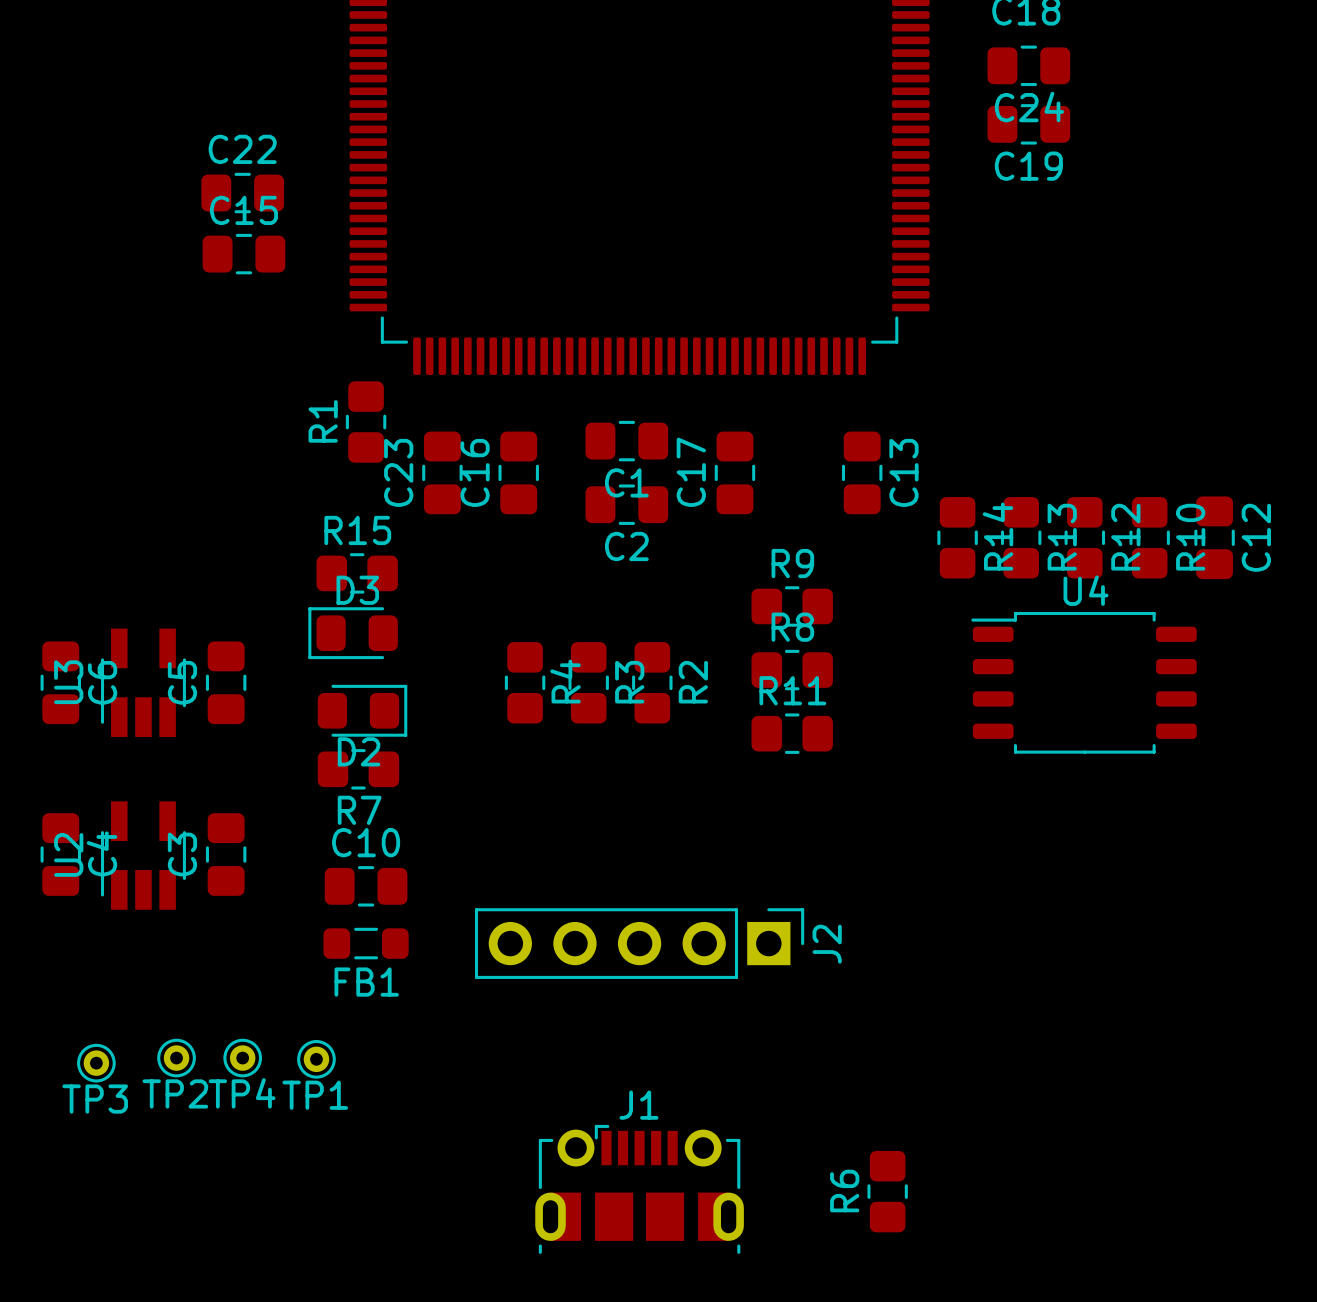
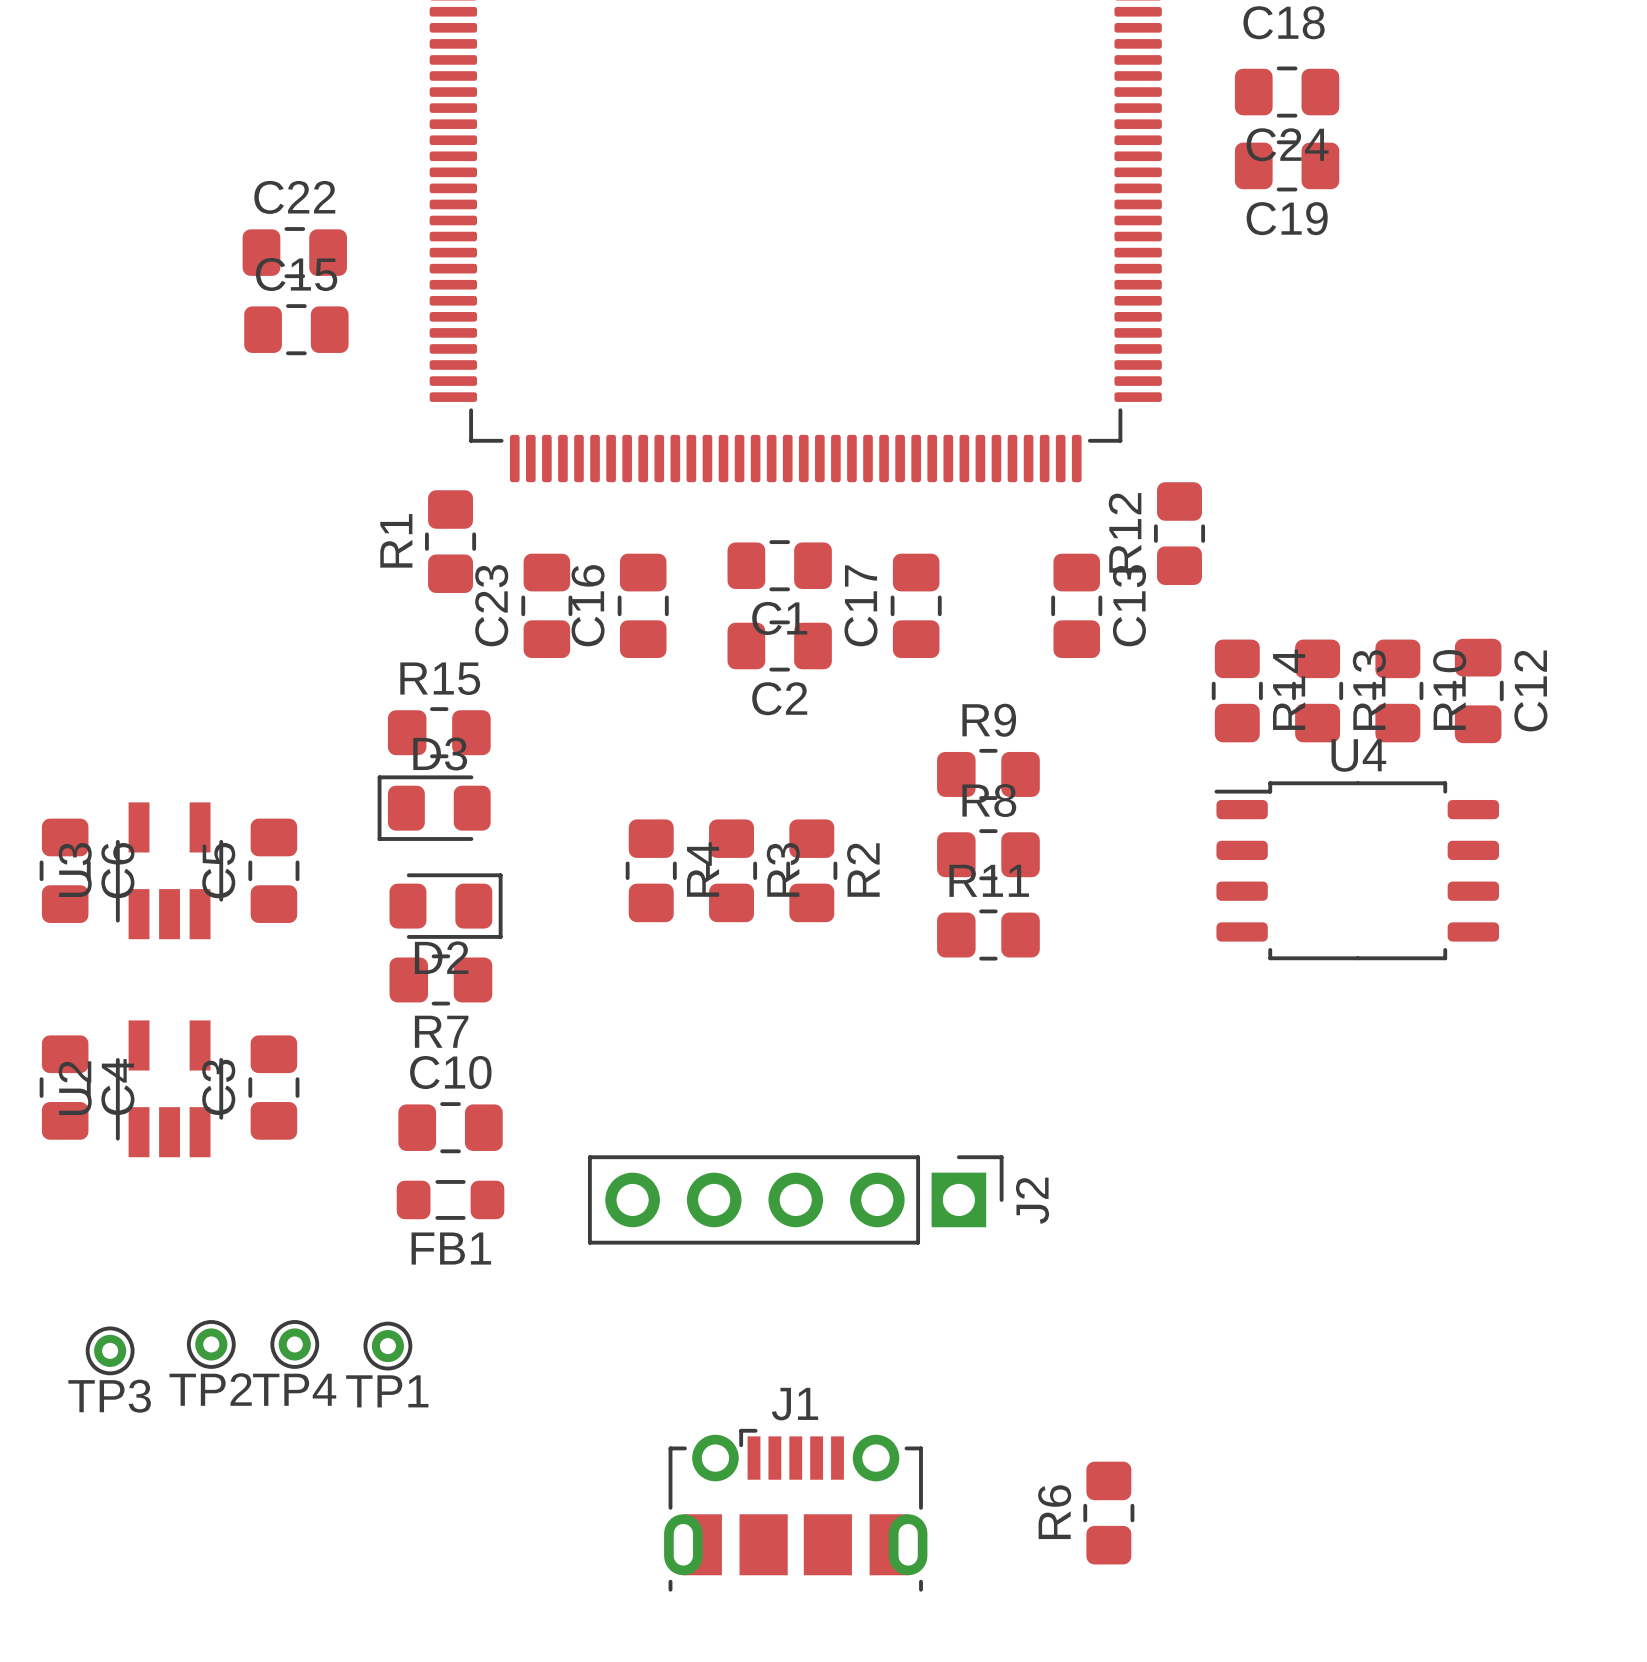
R14 position: (957, 537) -> (1237, 690)
R13 position: (1021, 537) -> (1317, 690)
R12 position: (1084, 537) -> (1179, 533)
R12 name position: R12 (1125, 537) -> R12 (1125, 532)
R10 position: (1149, 537) -> (1397, 690)
C12 position: (1214, 537) -> (1478, 690)

